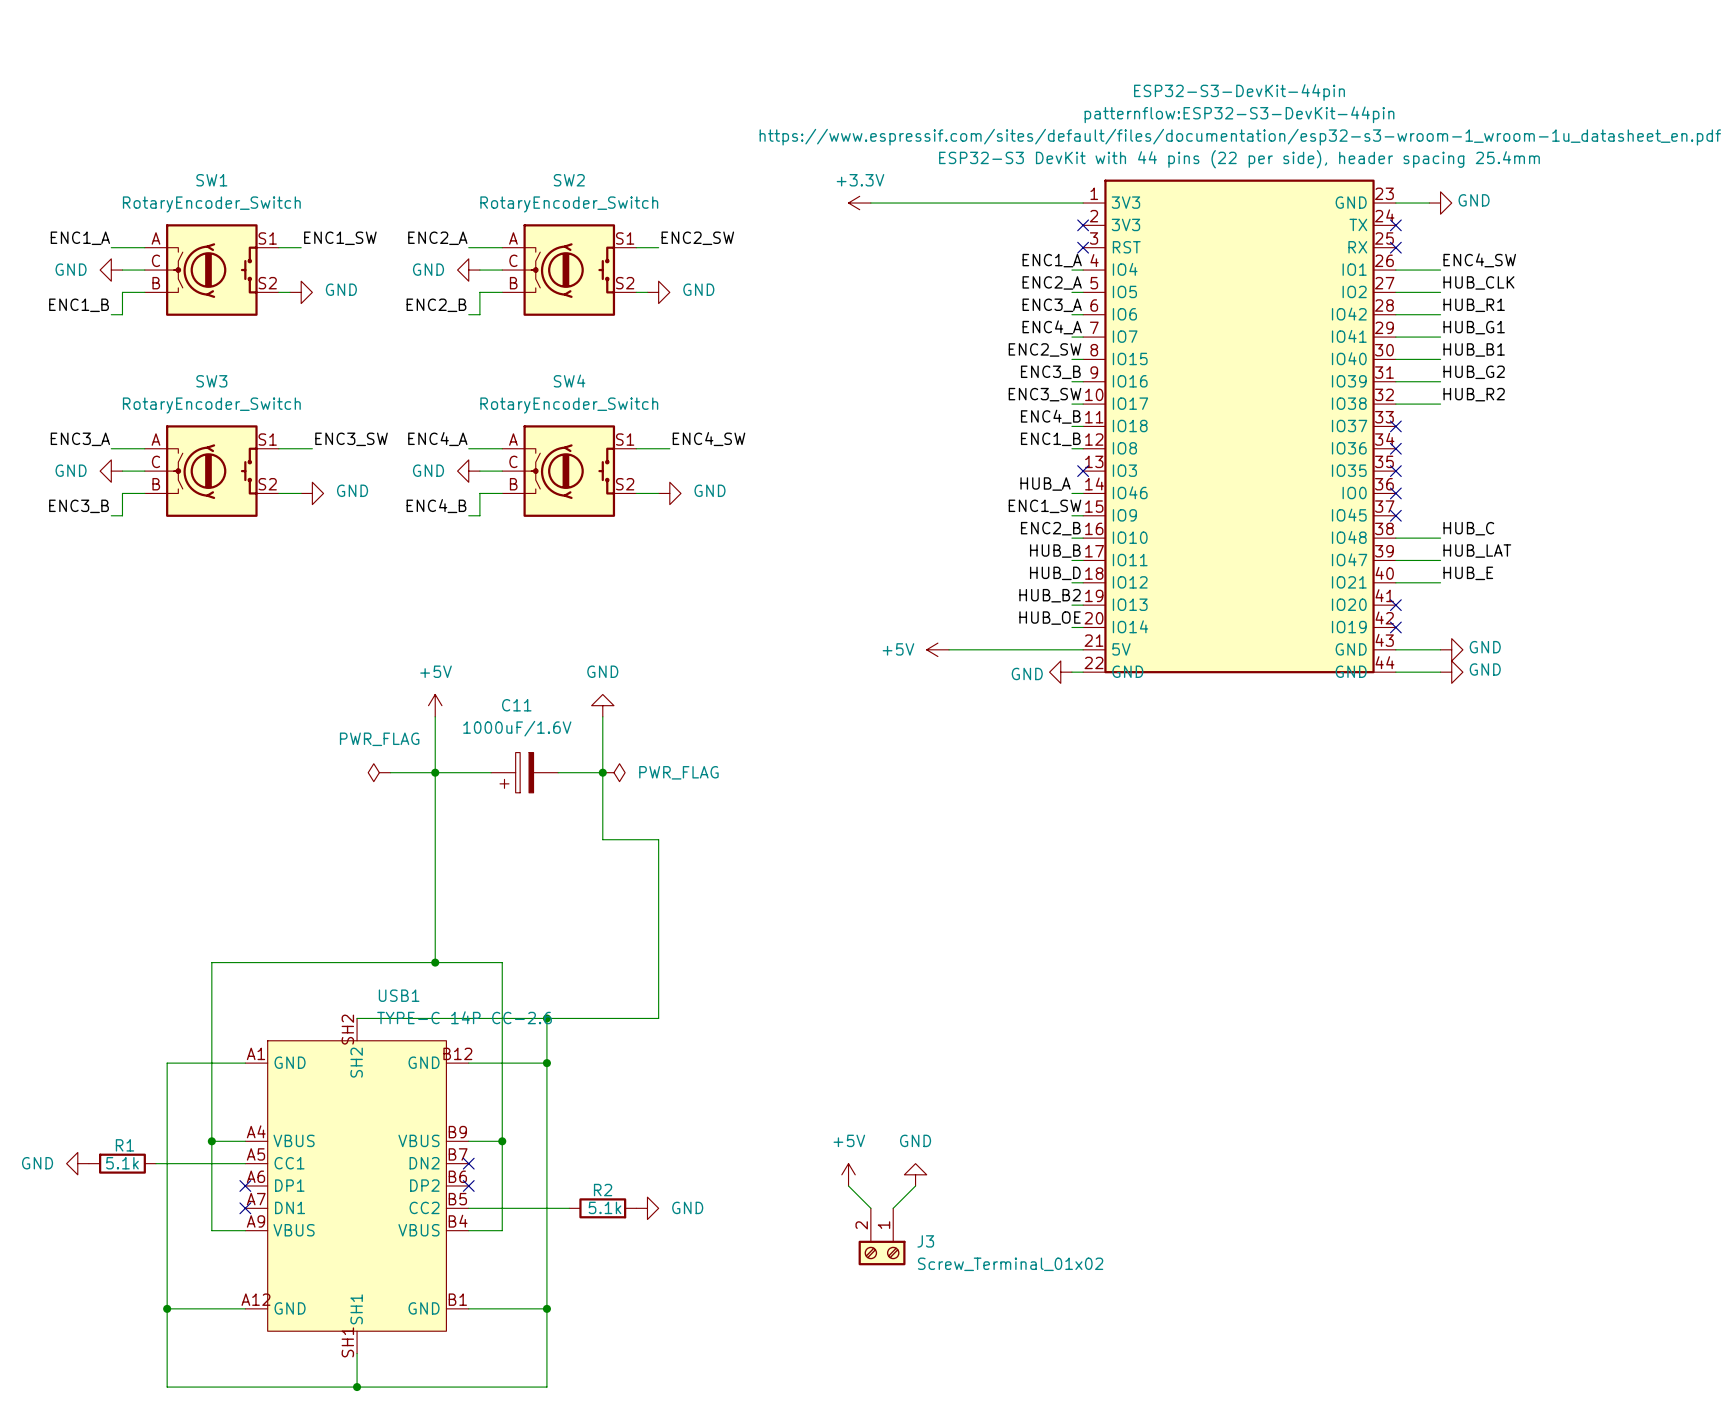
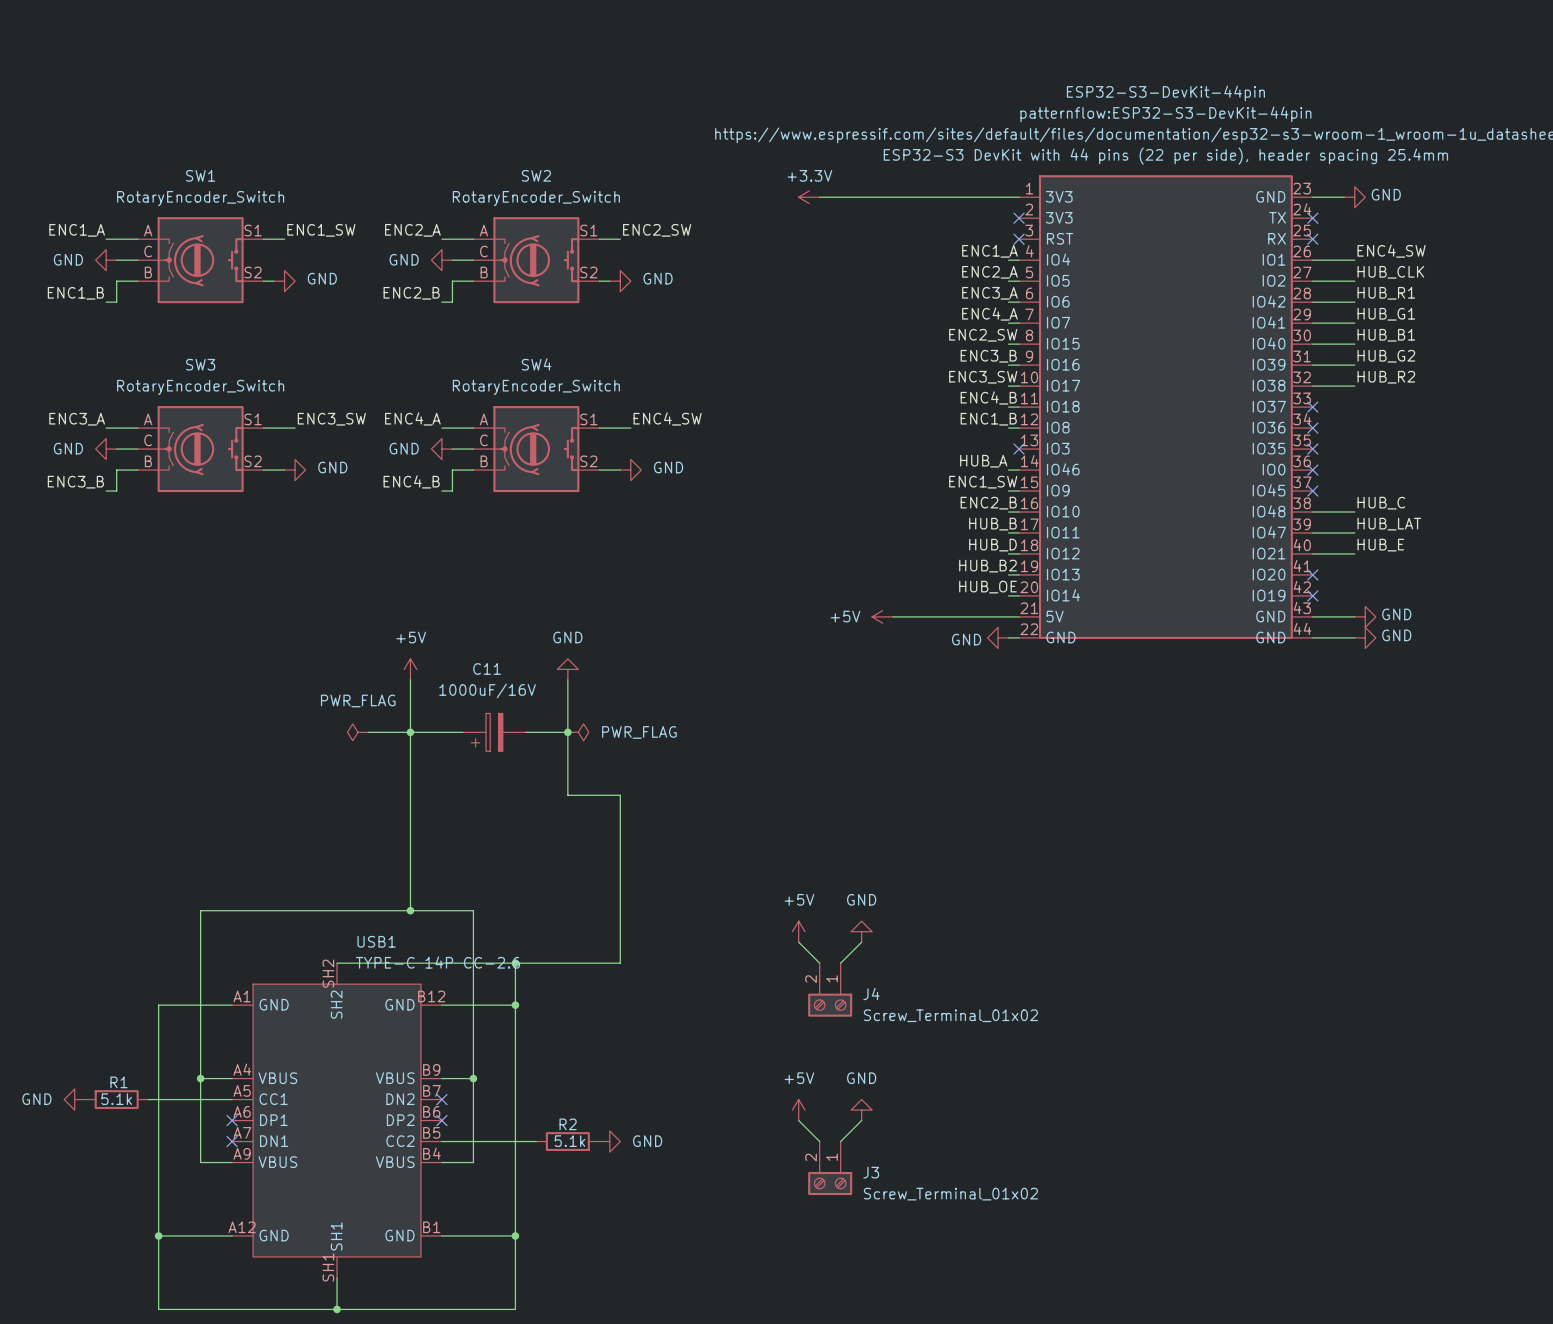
C11 value: 1000uF/1.6V (517, 728) -> 1000uF/16V (487, 690)
power symbol: none -> +5V (798, 931)
power symbol: none -> GND (861, 931)
wire: none -> (798, 942) (819, 963)
wire: none -> (861, 942) (840, 963)
J4: none -> Screw_Terminal_01x02 (830, 989)

